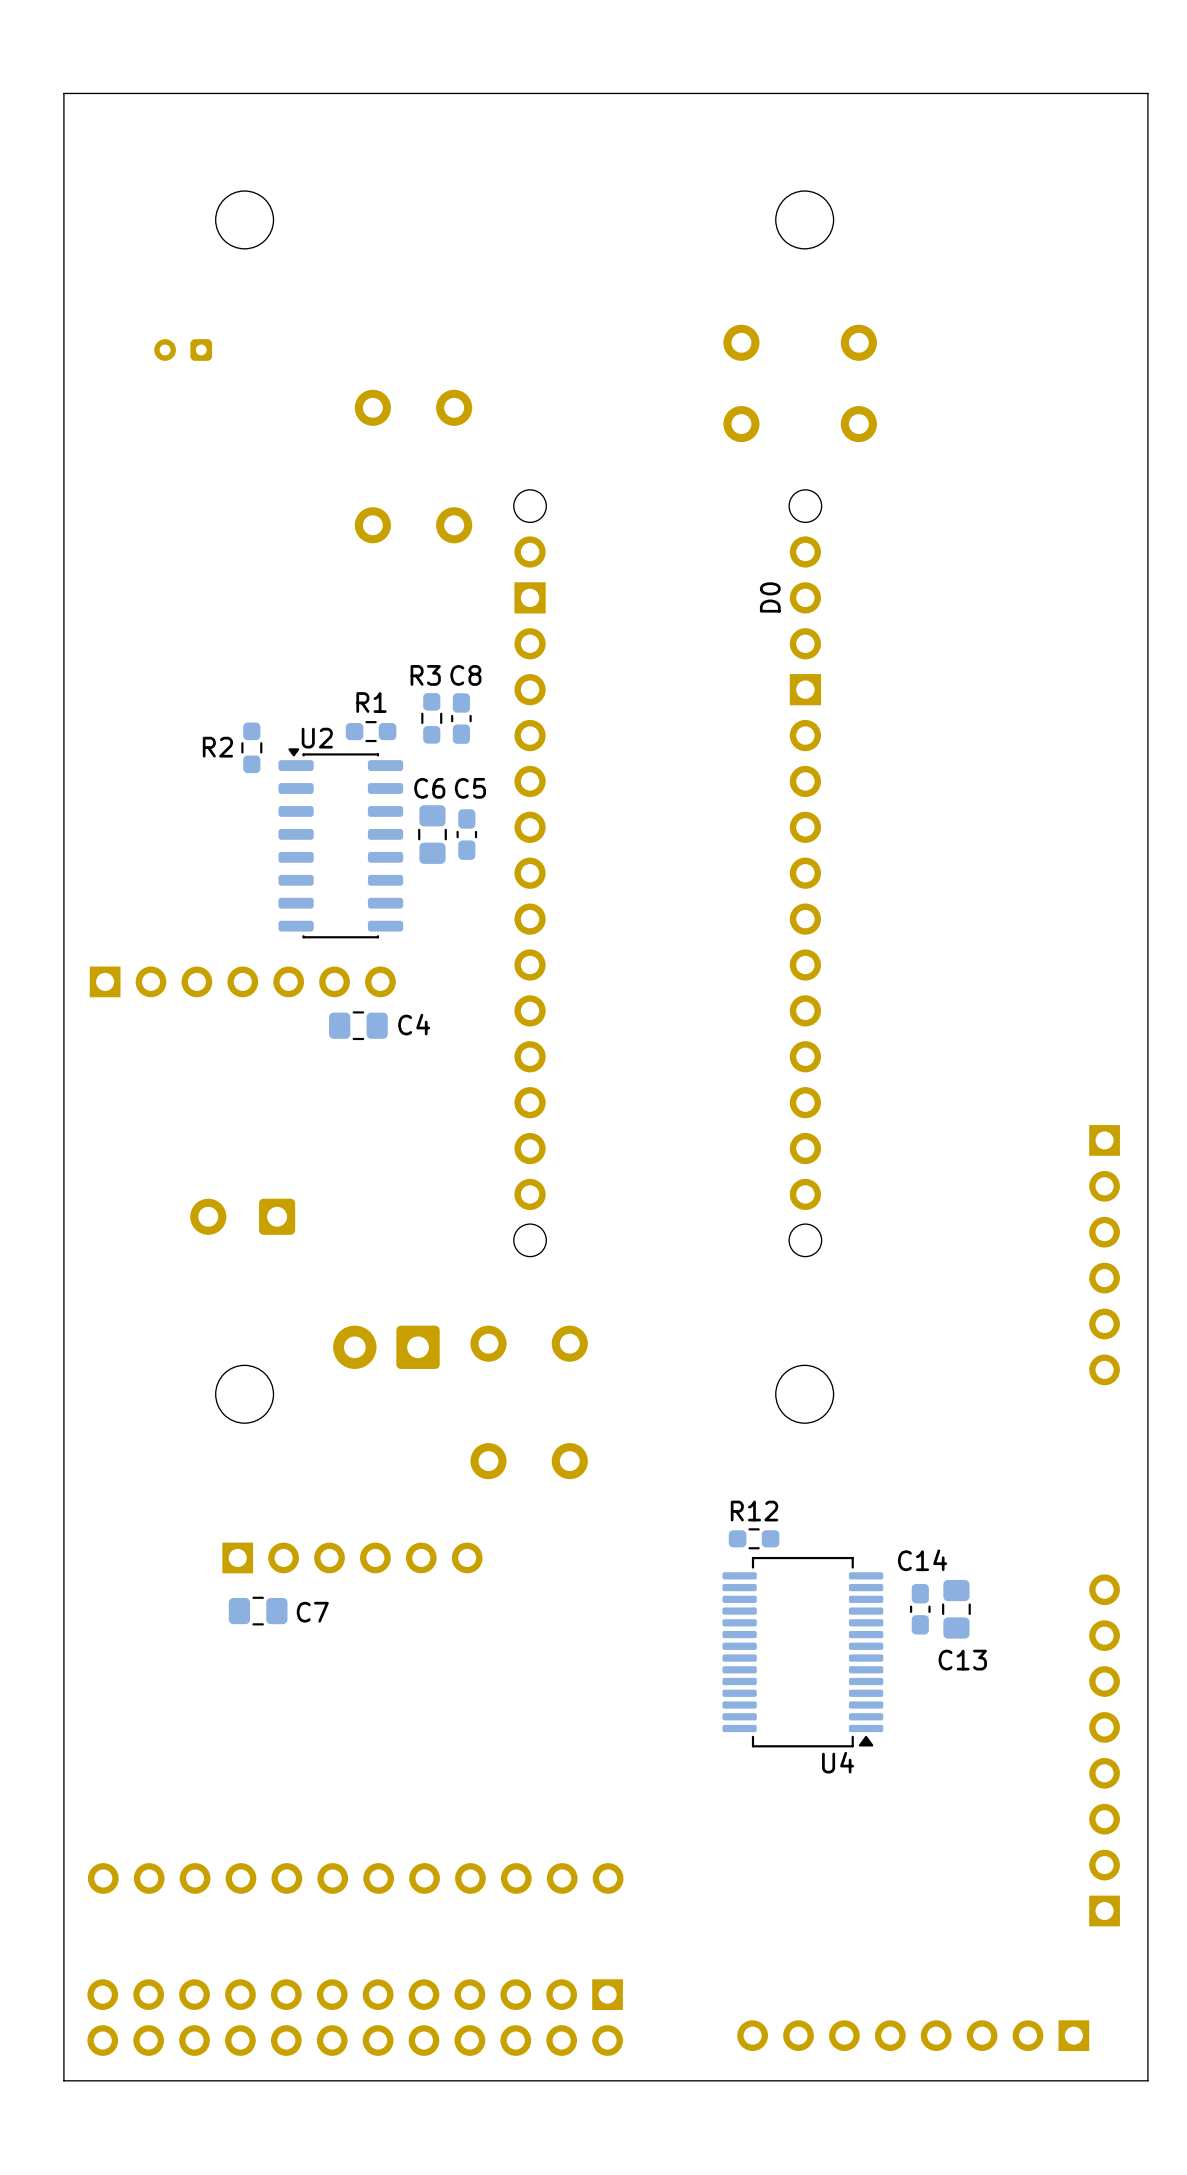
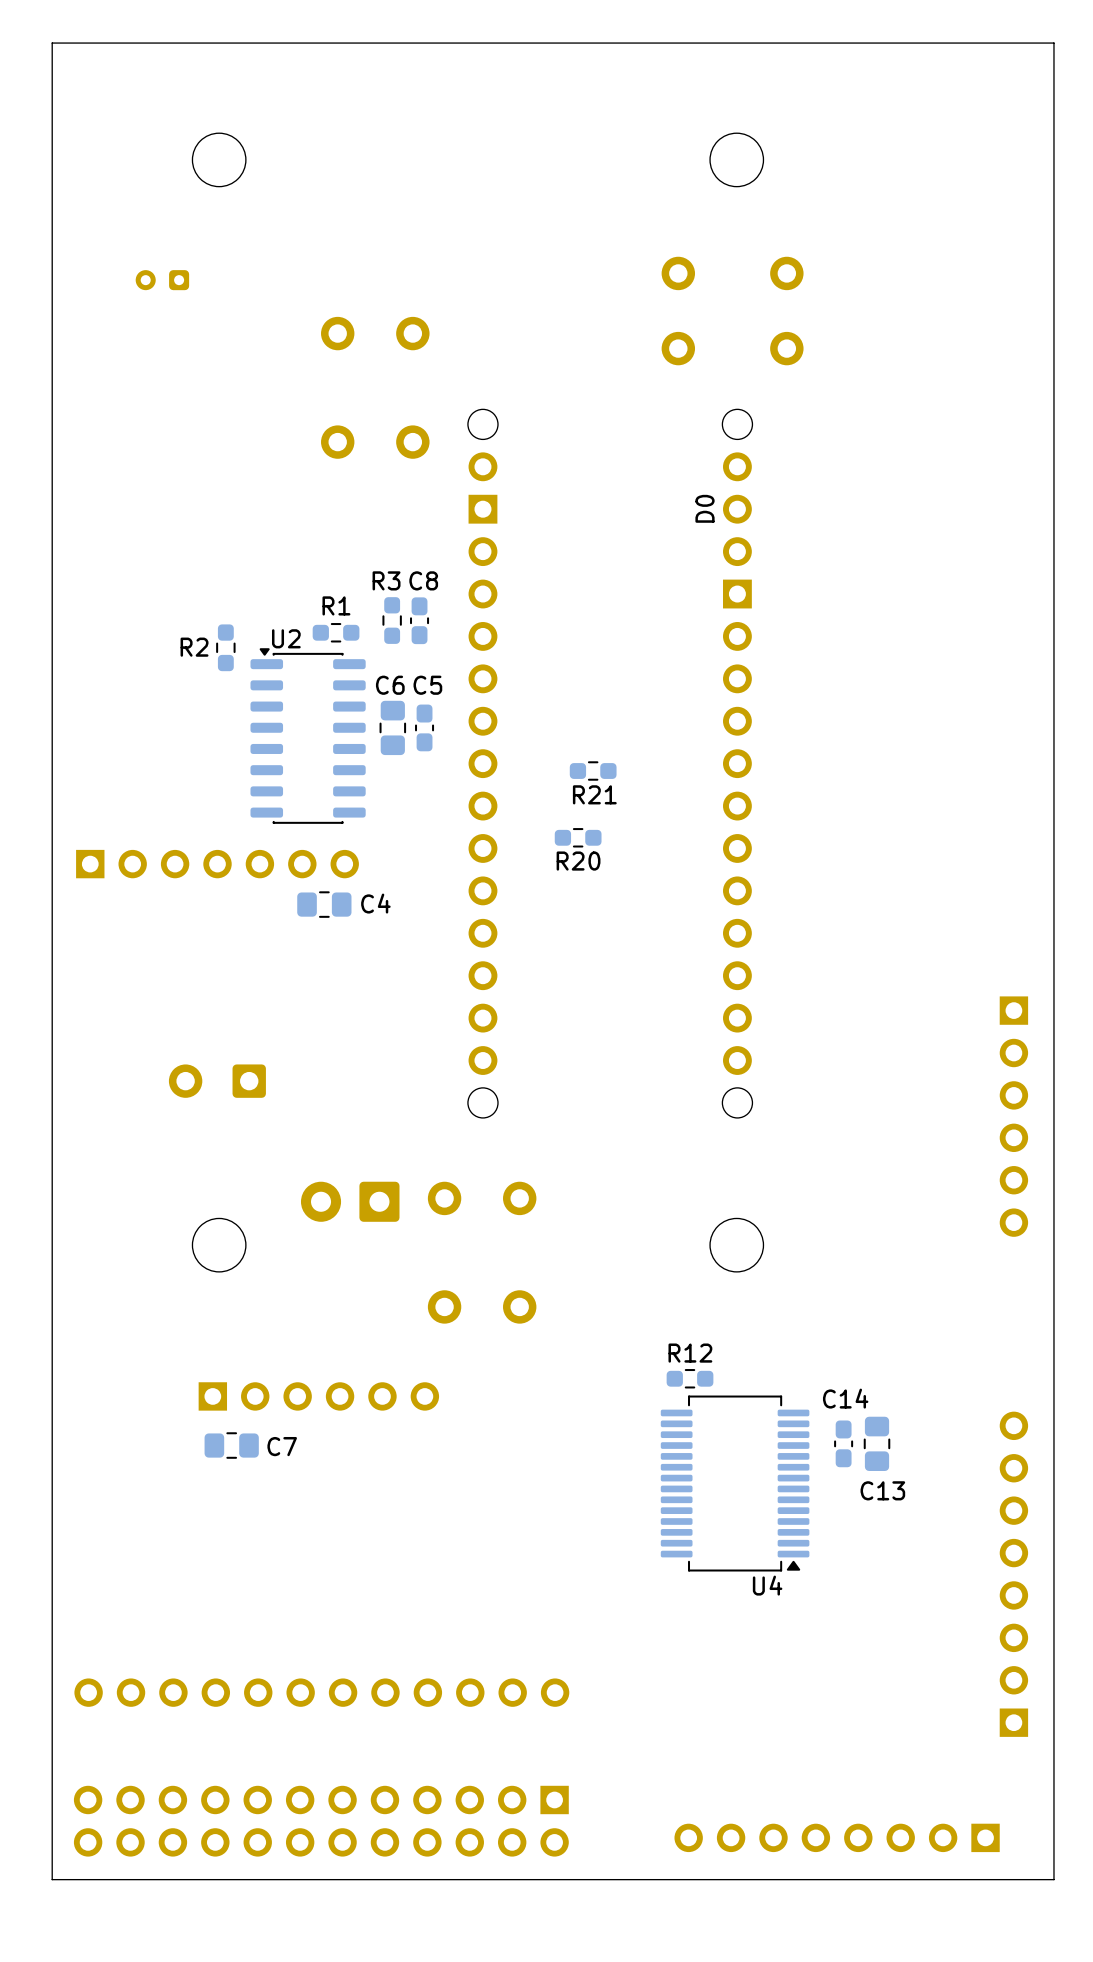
R21: none -> (593, 771)
R20: none -> (578, 837)

